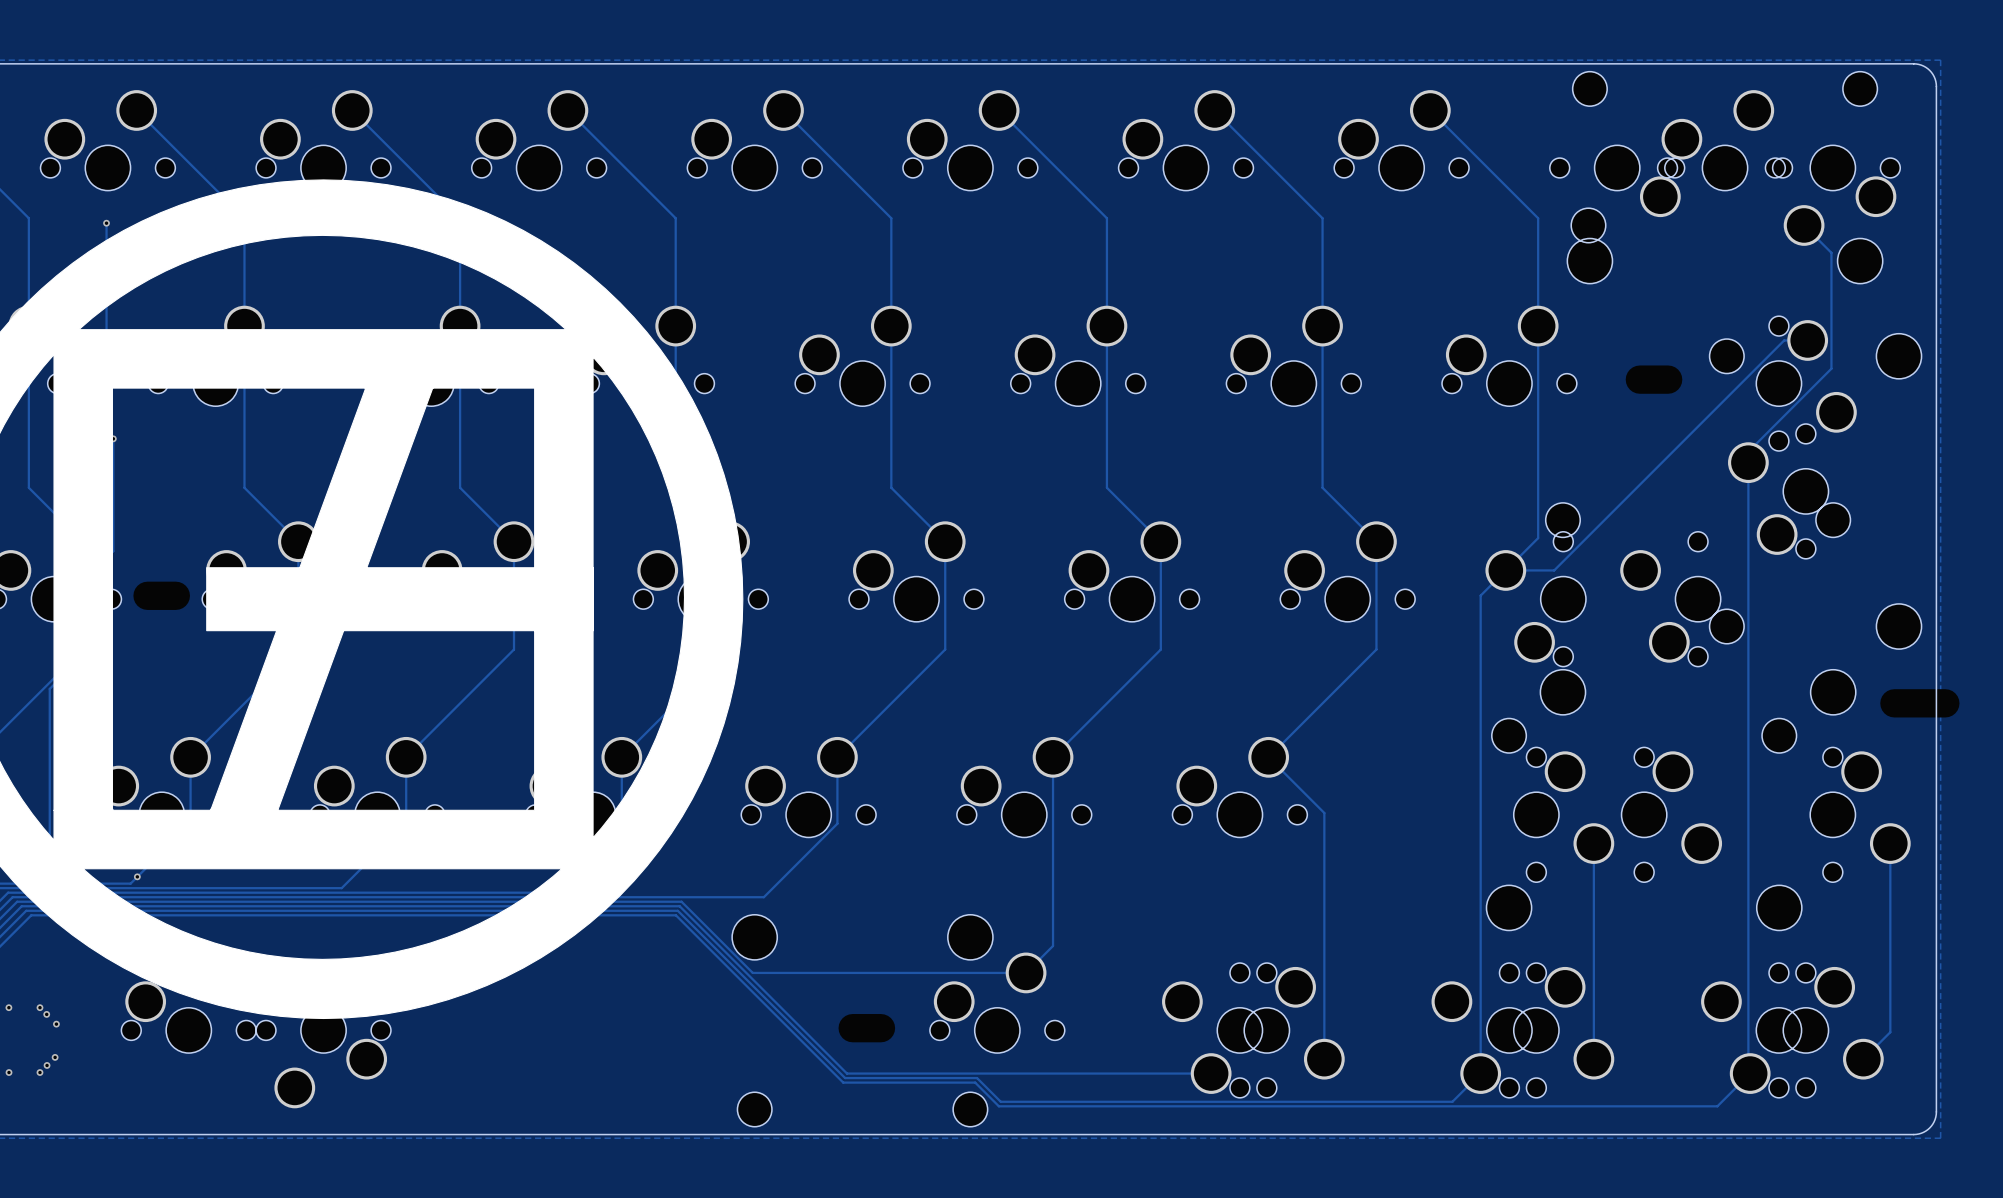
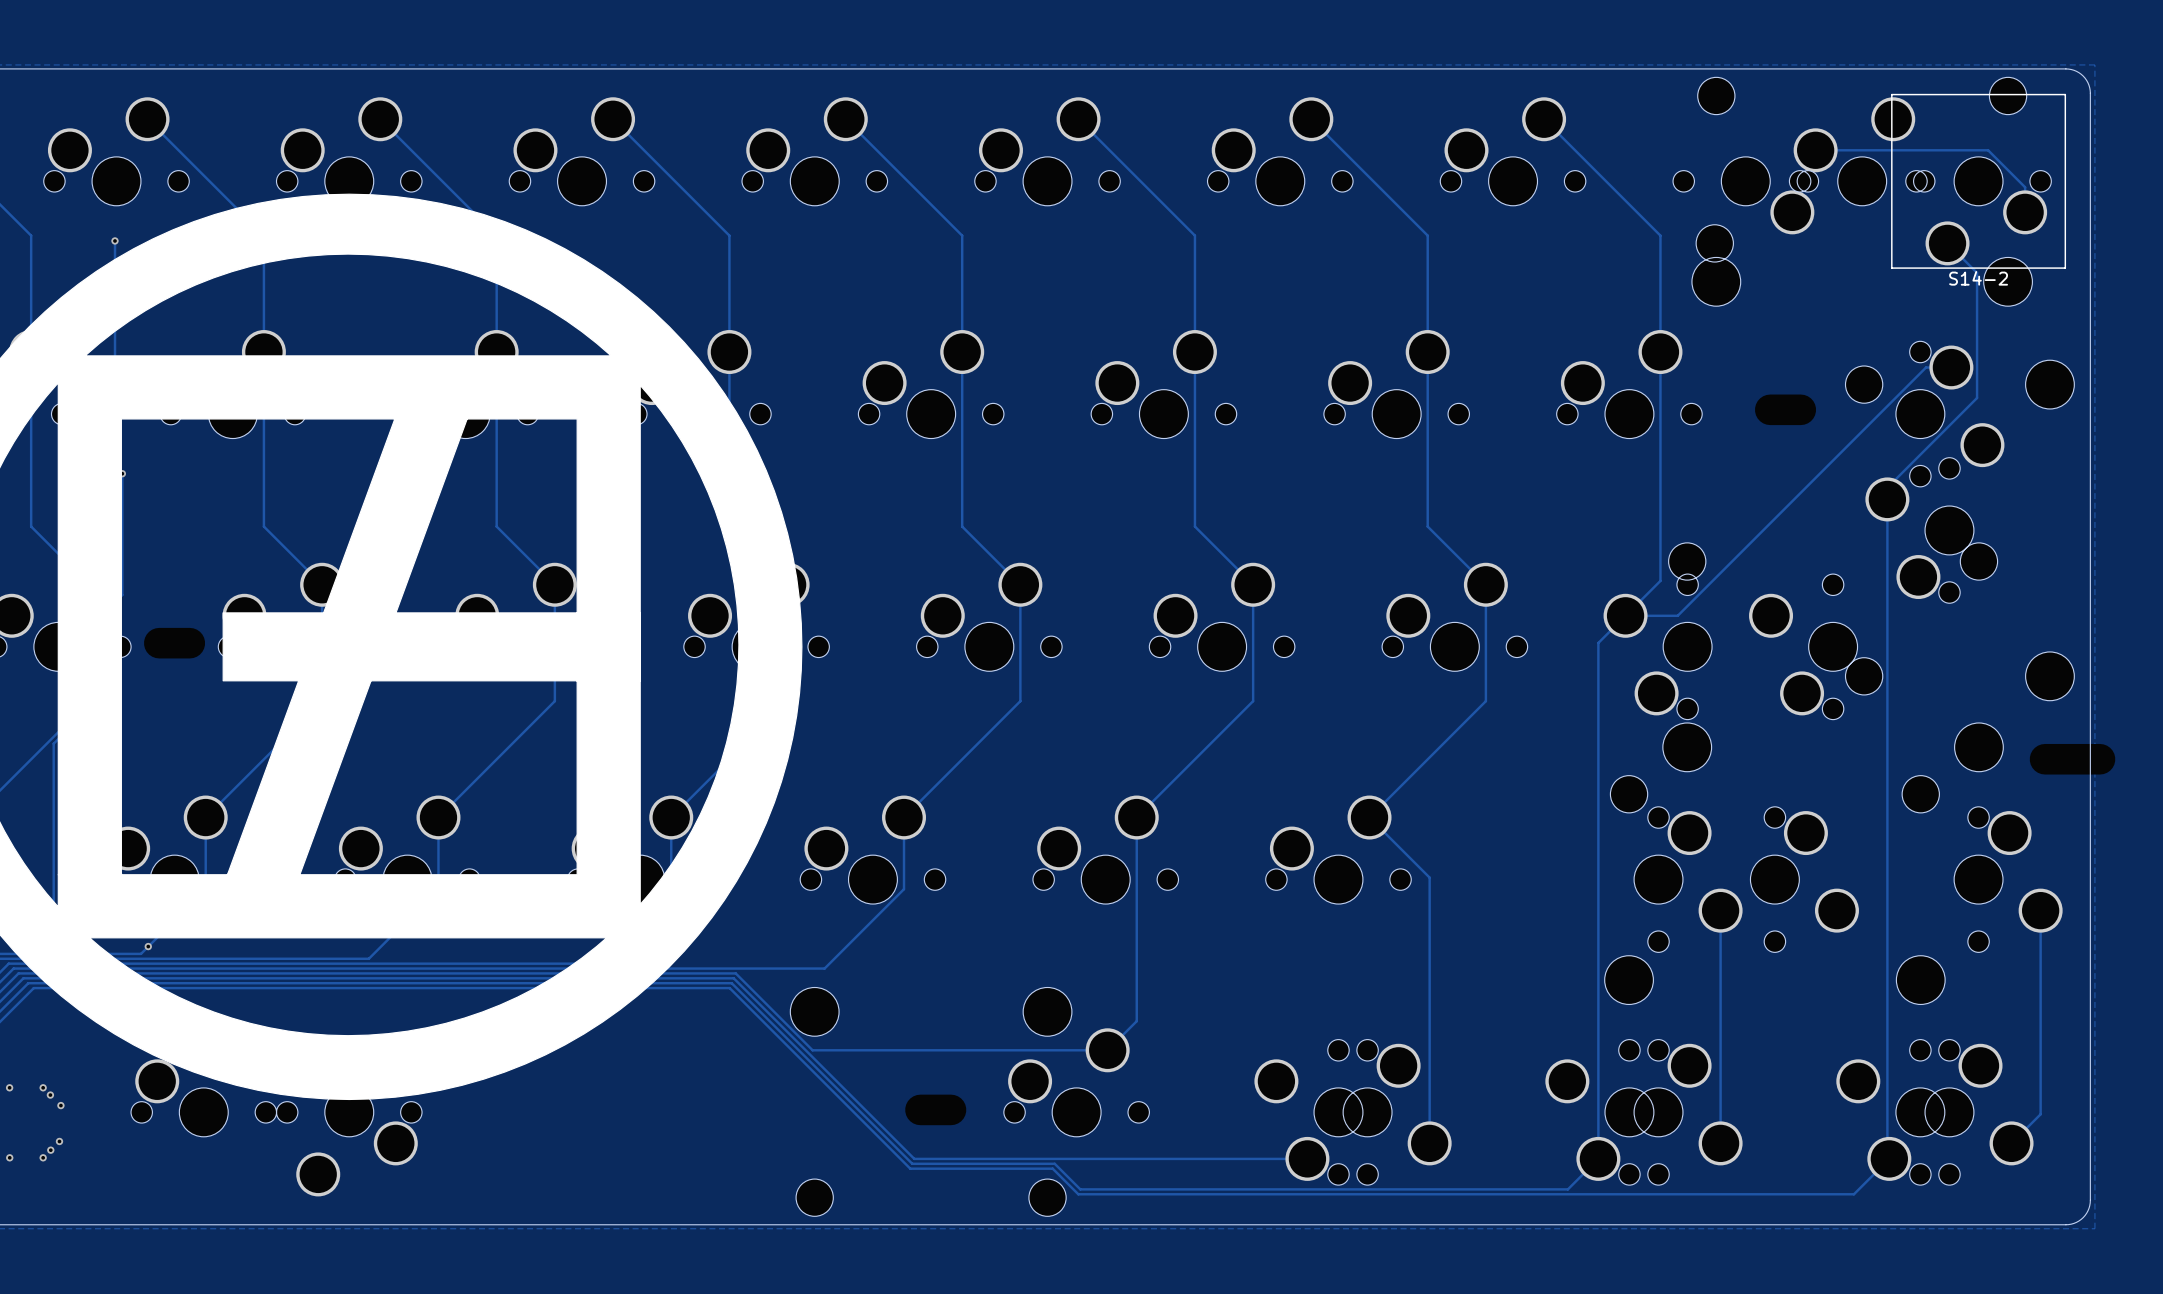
track: none -> (1815, 150) (1988, 150) (2025, 187) (2025, 212)
S14-2: none -> (1978, 181)
part: (1832, 195) -> none

